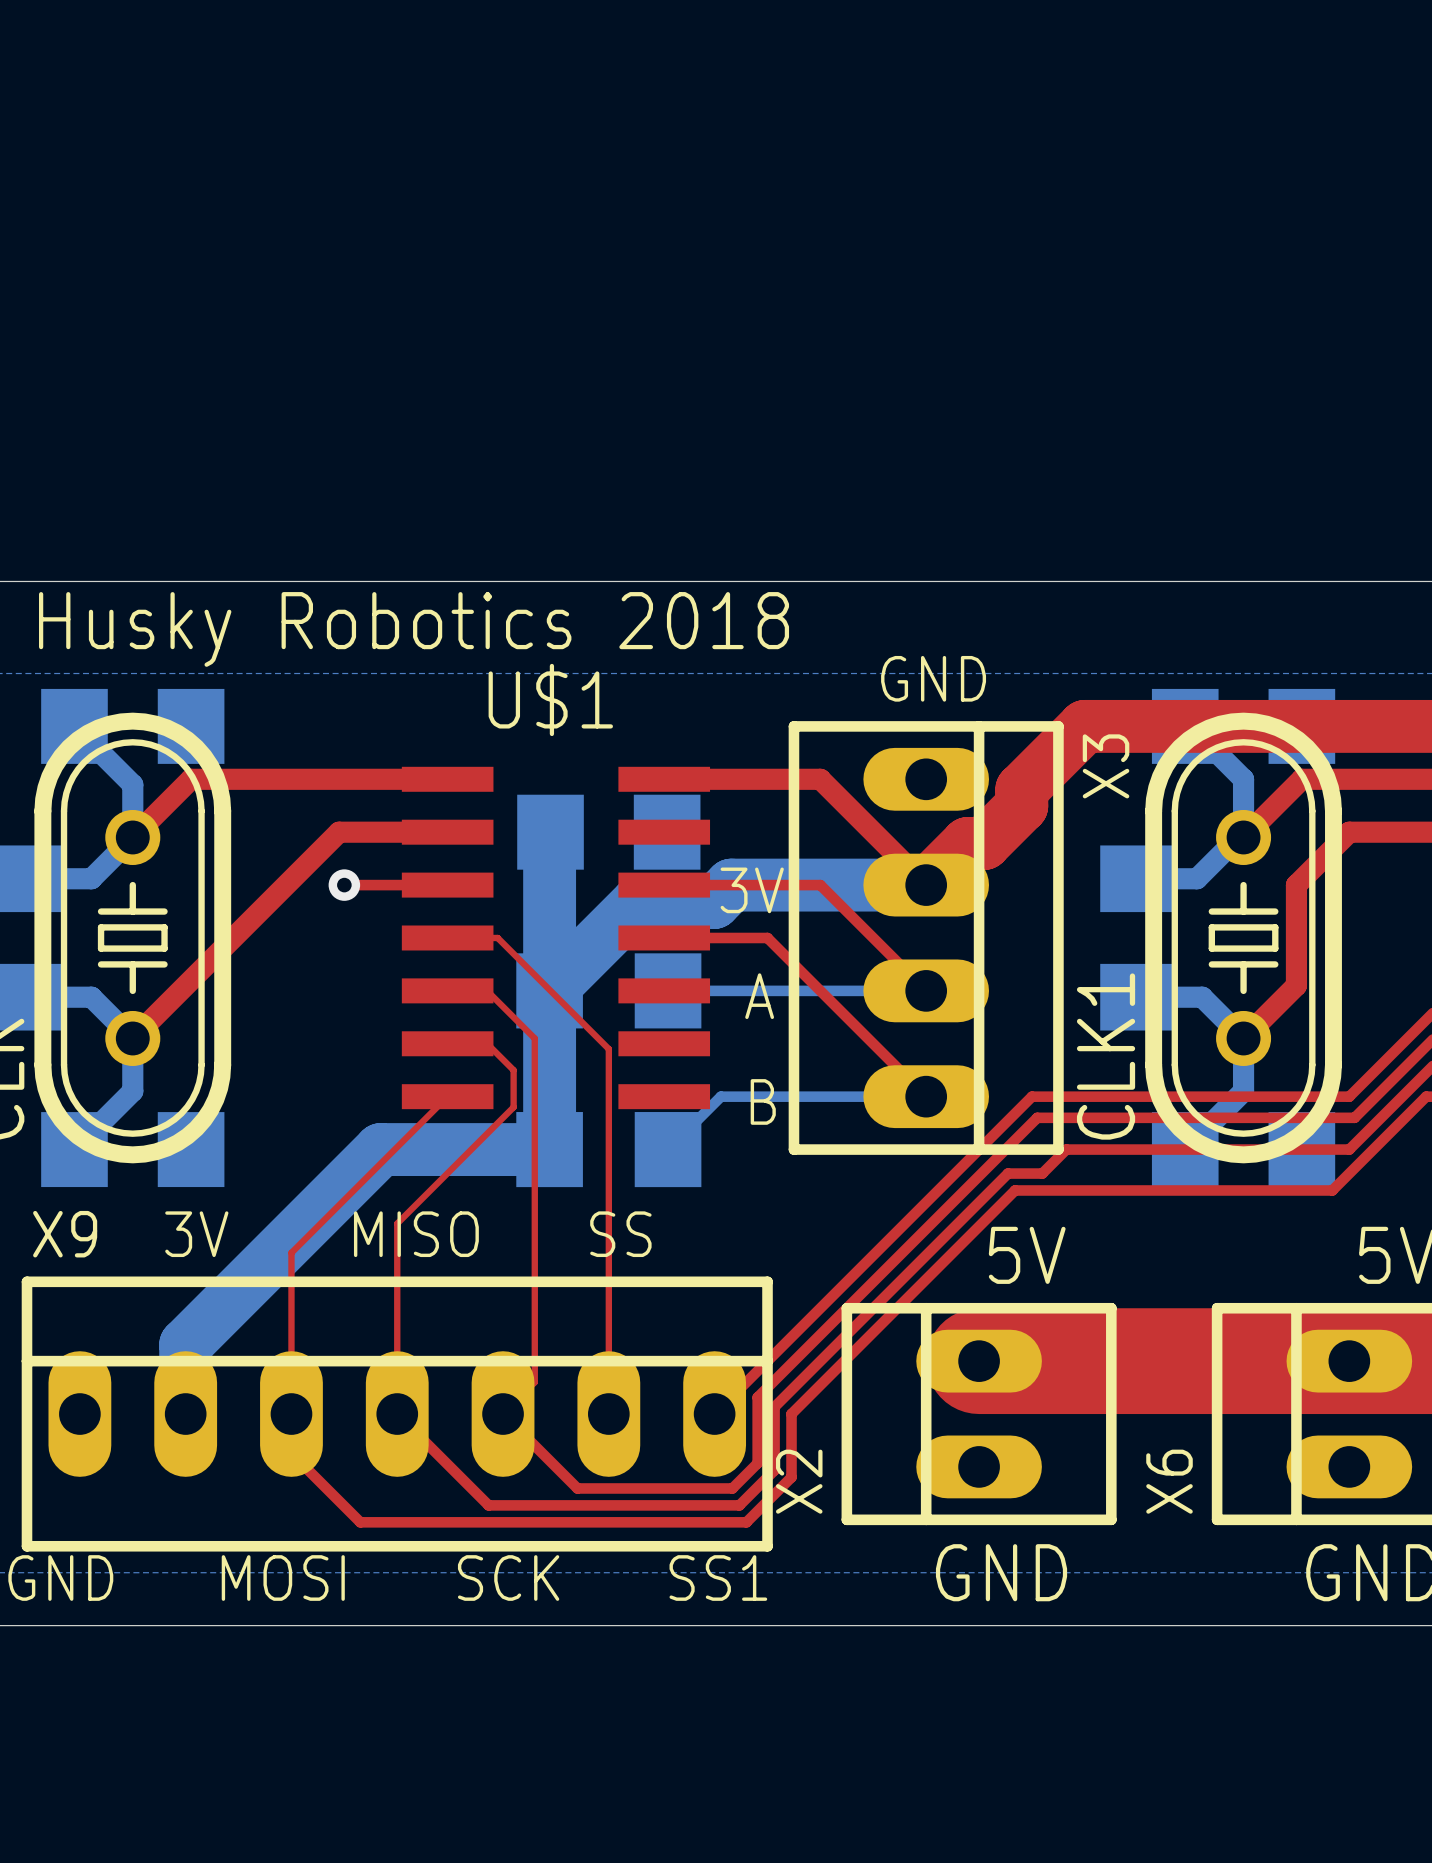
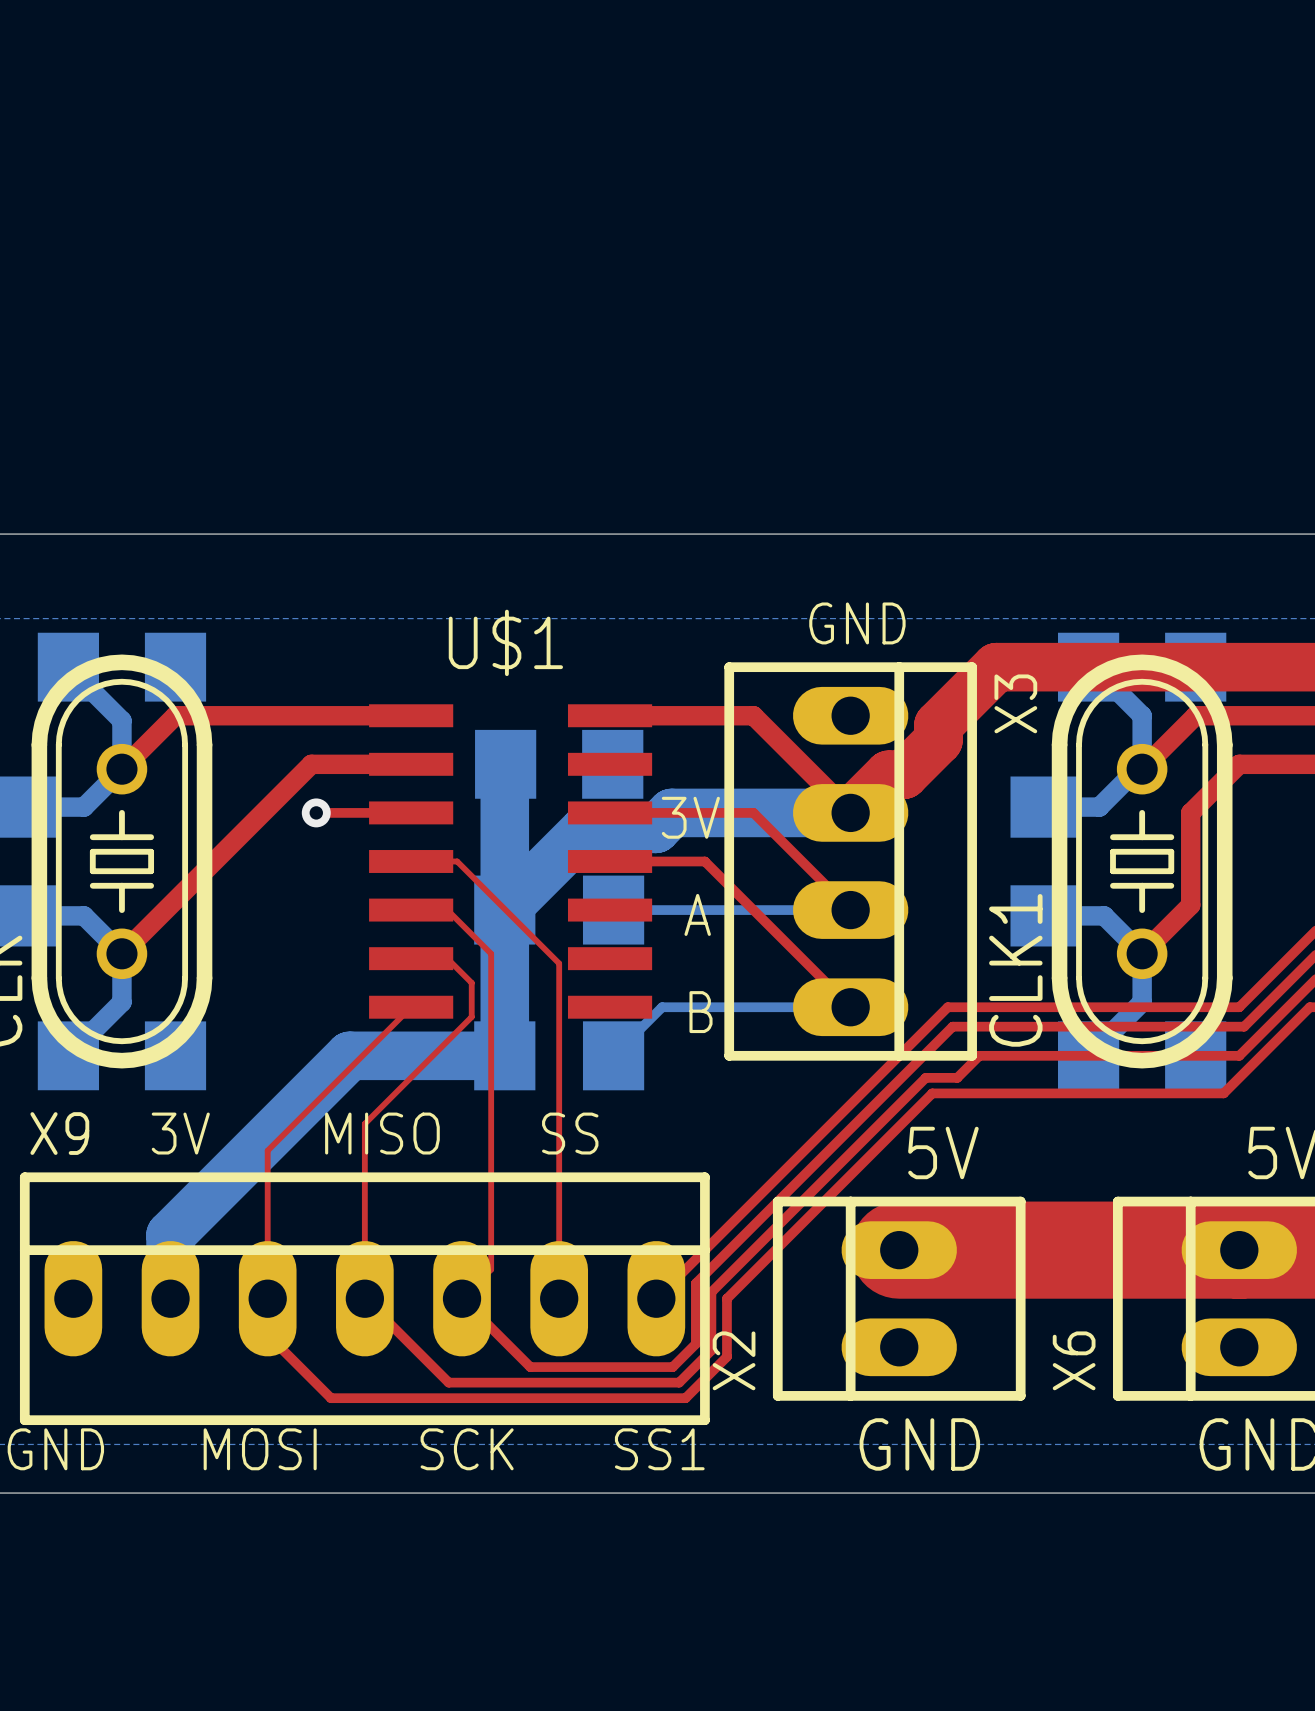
text: Husky Robotics 2018 (414, 629) -> none

